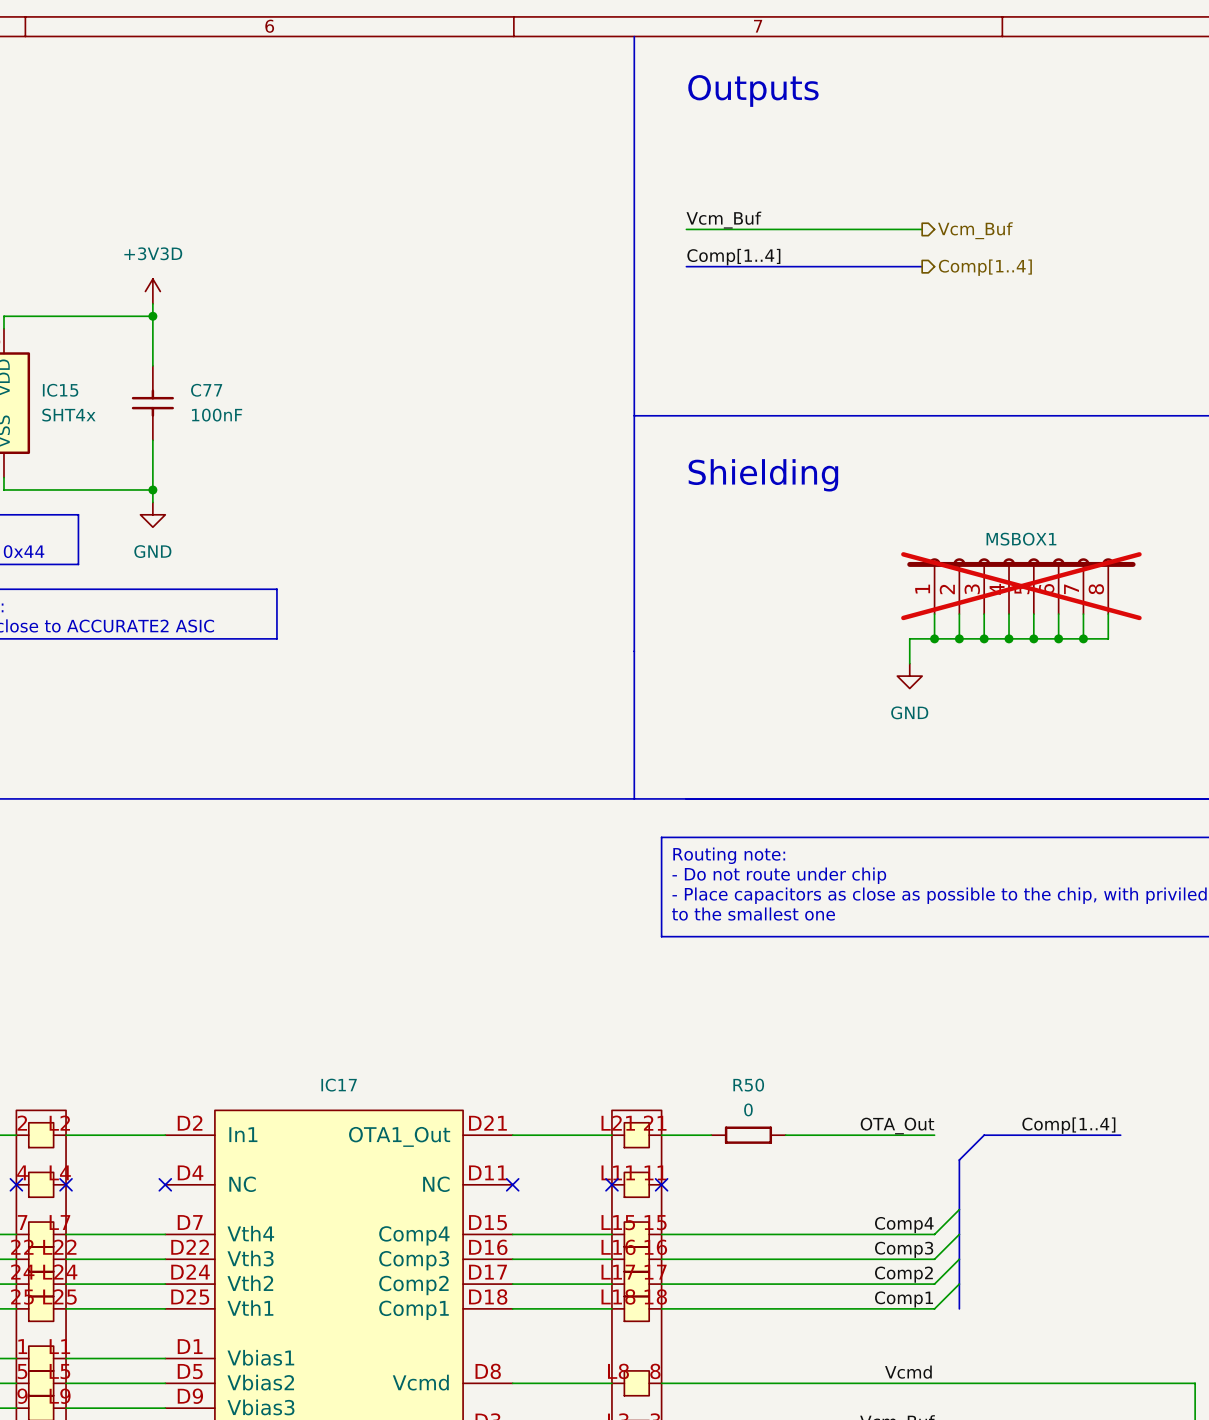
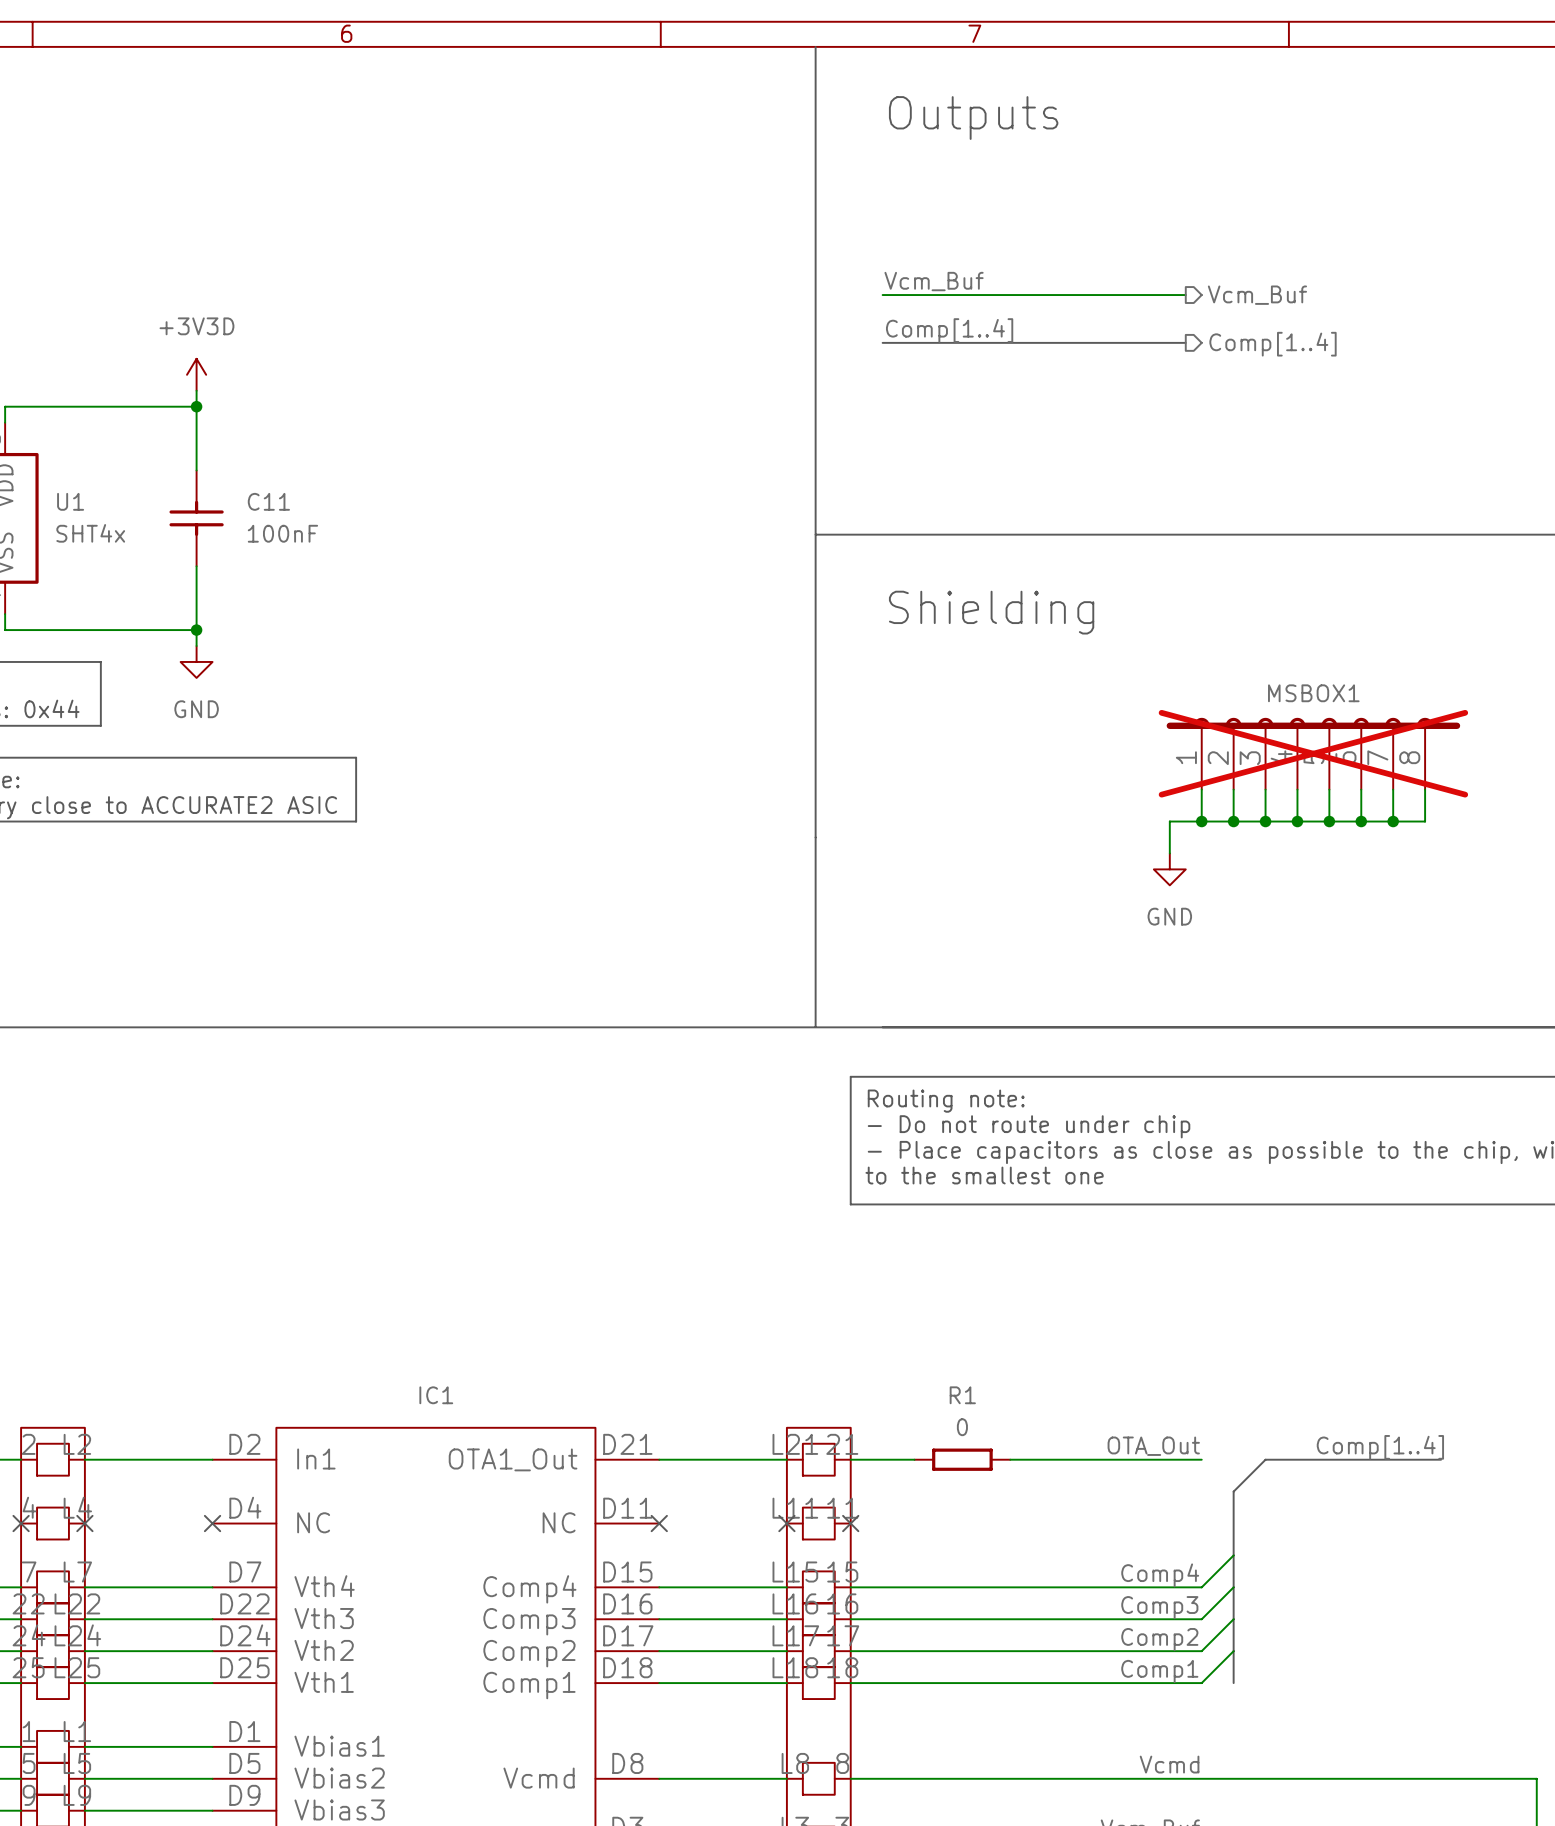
IC15 name: IC15 (60, 390) -> U1 (70, 501)
C77 name: C77 (206, 390) -> C11 (268, 501)
IC17 name: IC17 (339, 1085) -> IC1 (436, 1395)
R50 name: R50 (748, 1085) -> R1 (962, 1395)

